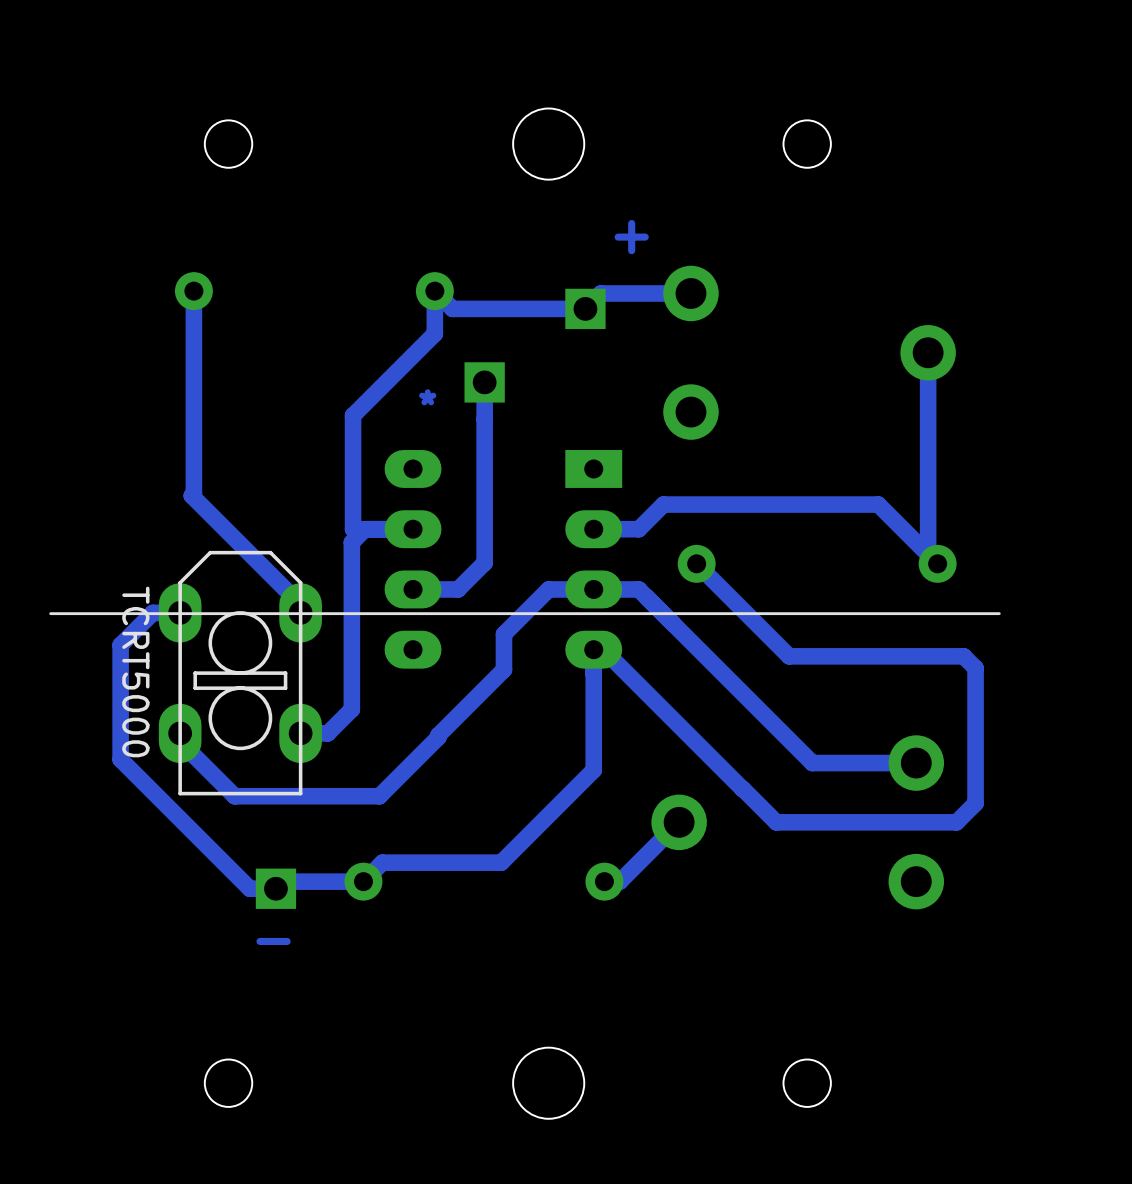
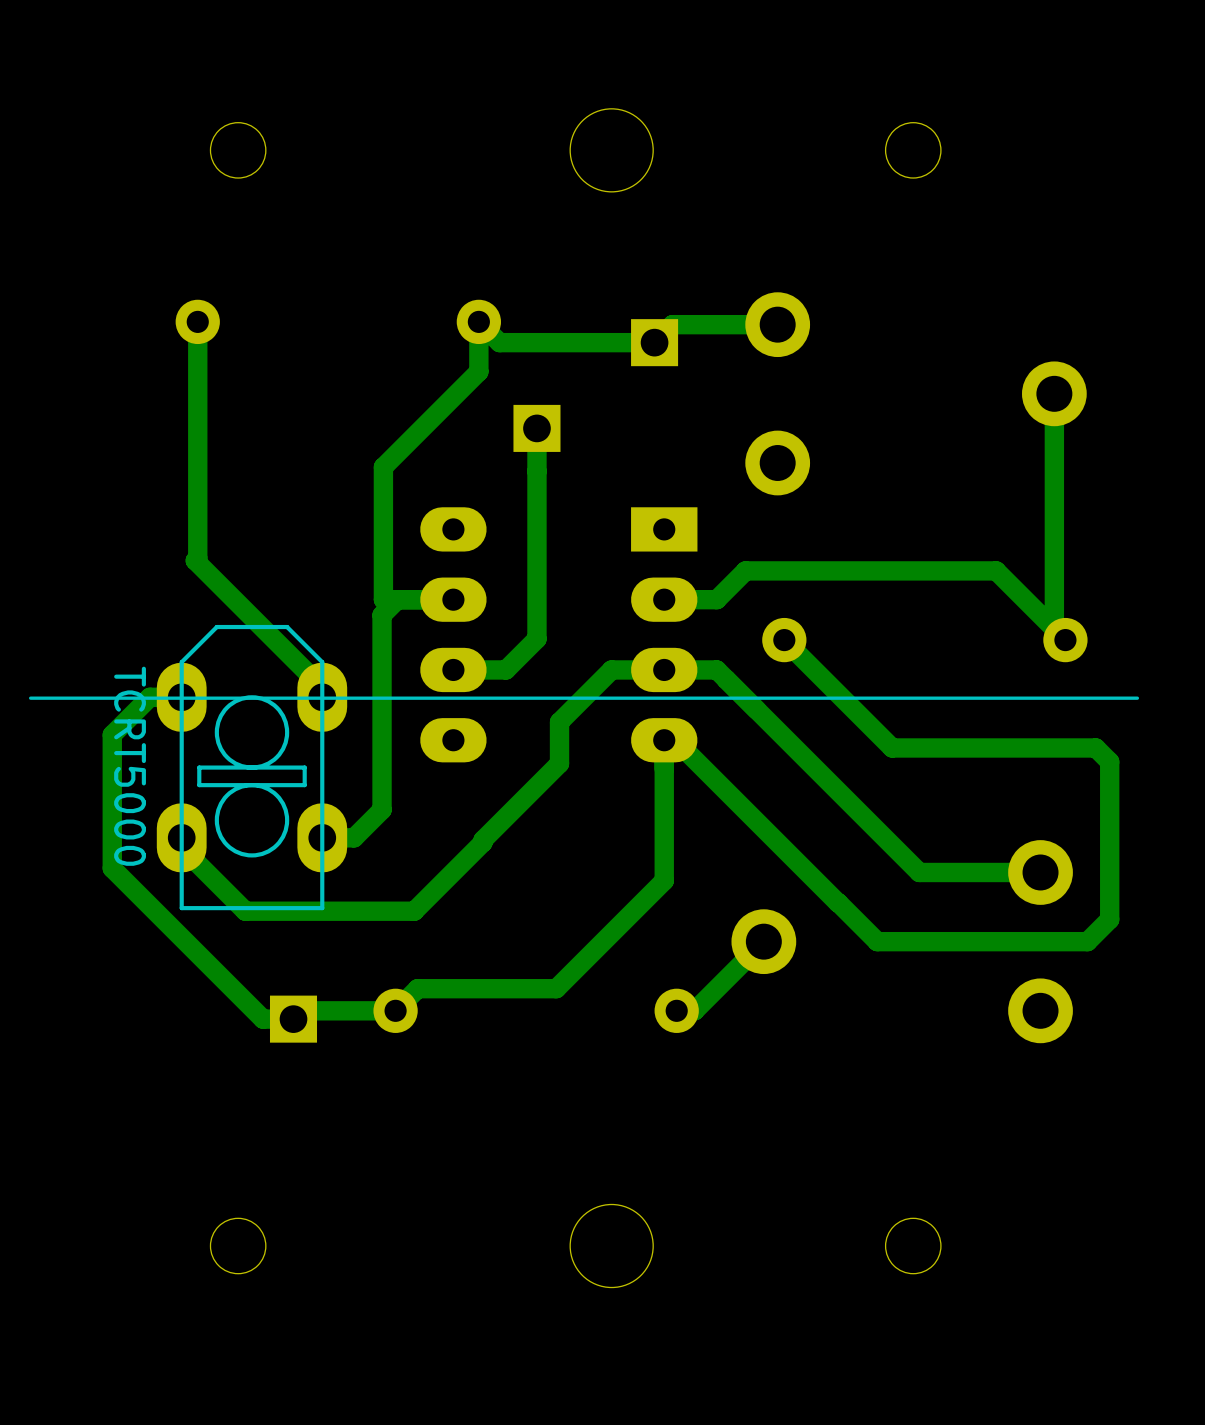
text: + (631, 237) -> none
text: * (427, 397) -> none
text: - (273, 941) -> none

